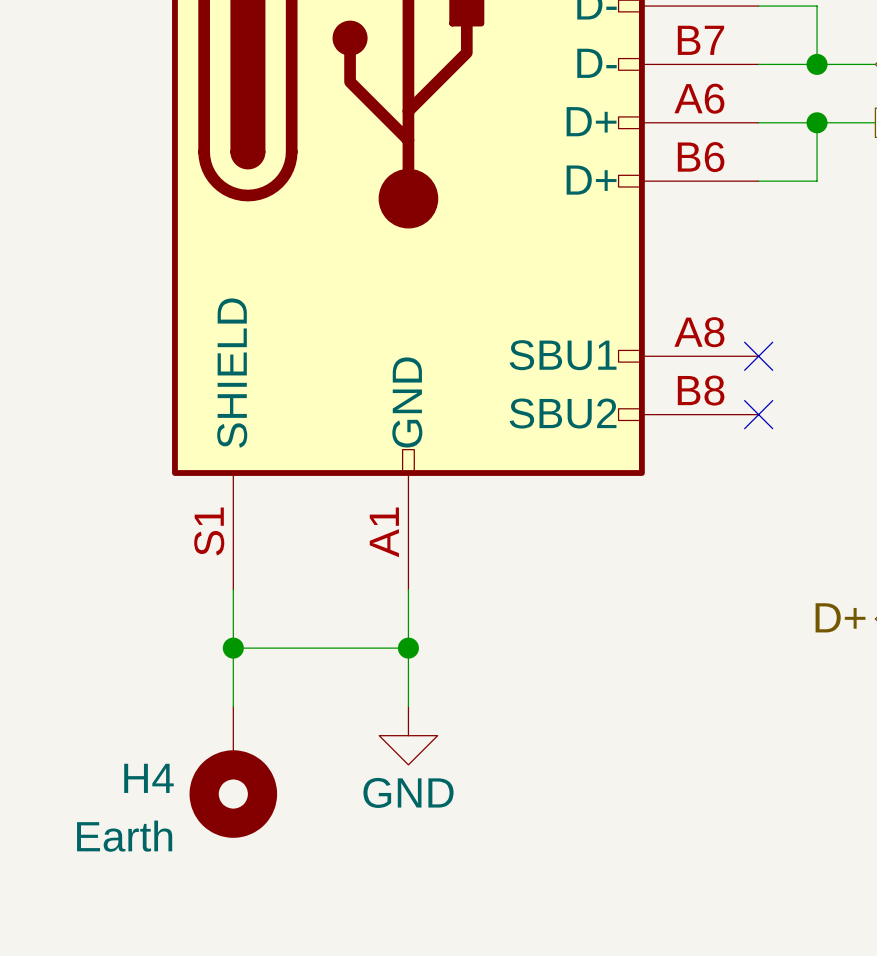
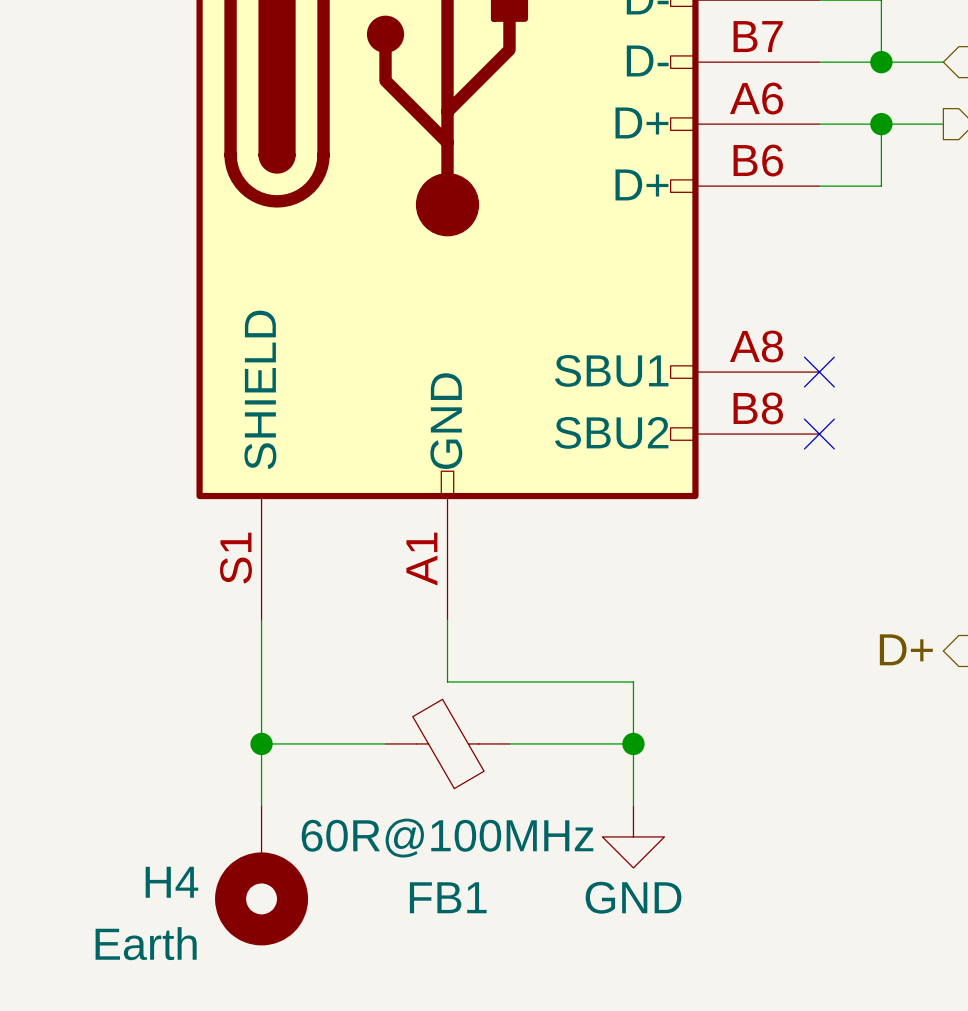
wire: (233, 648) (408, 648) (408, 706) -> none
junction position: (233, 648) -> (261, 743)
wire: none -> (447, 681) (633, 681) (633, 805)
junction: (408, 648) -> none
wire: none -> (385, 743) (261, 743) (261, 805)
FB1: none -> 60R@100MHz (447, 743)
wire: none -> (509, 743) (633, 743)
junction: none -> (633, 743)
power symbol position: GND (408, 735) -> GND (633, 836)
H4 position: (233, 772) -> (261, 875)

